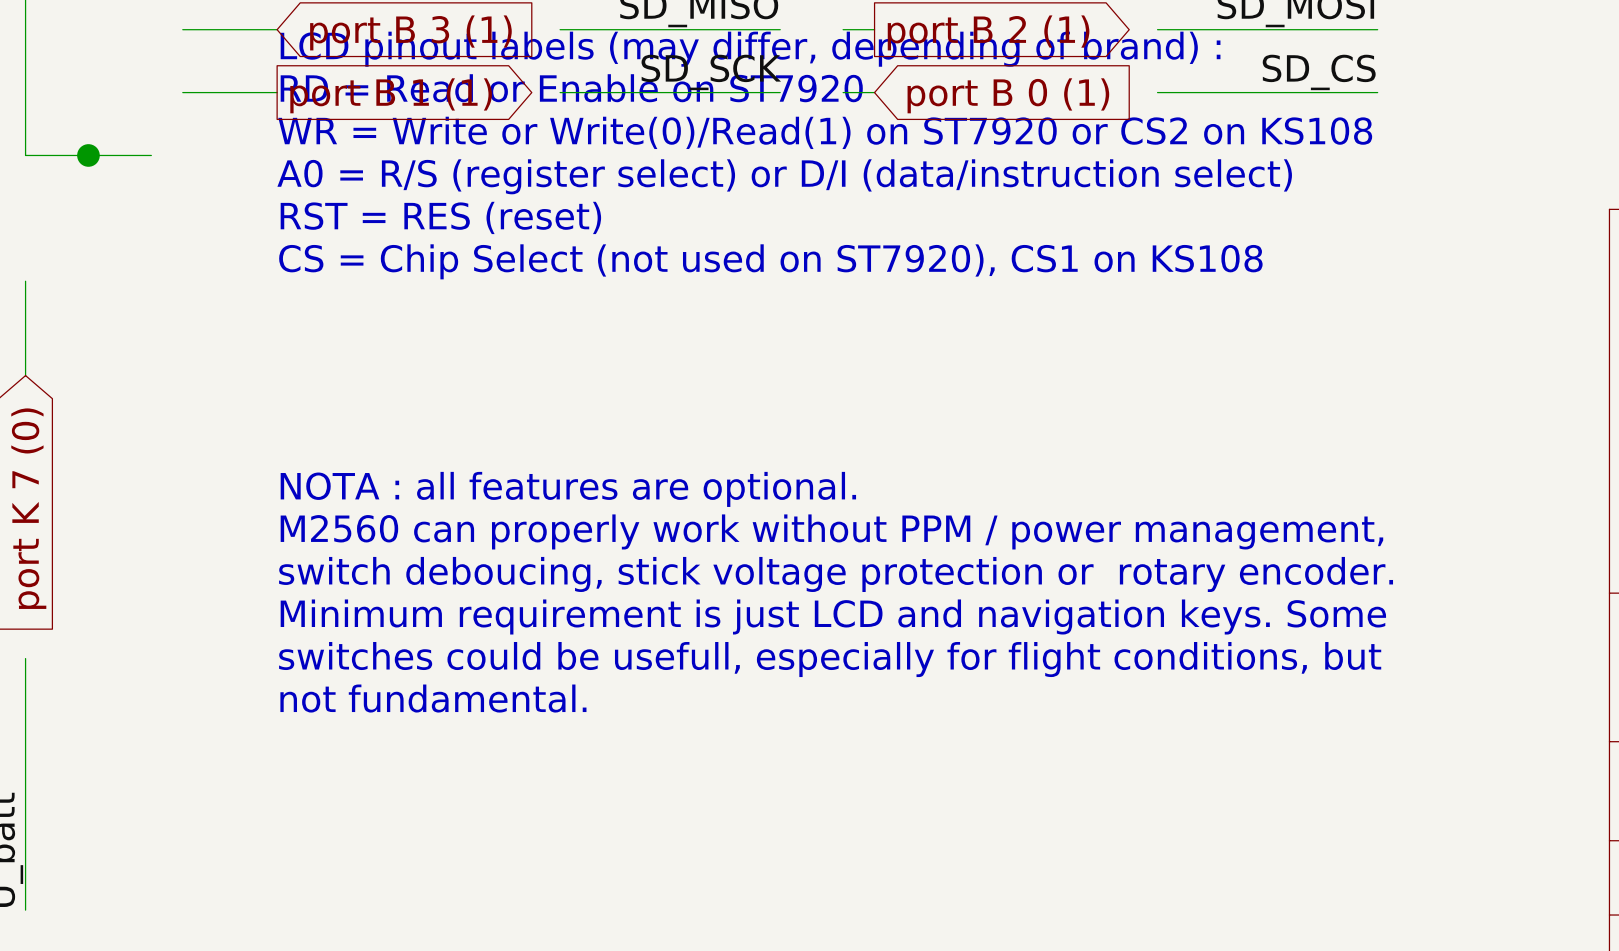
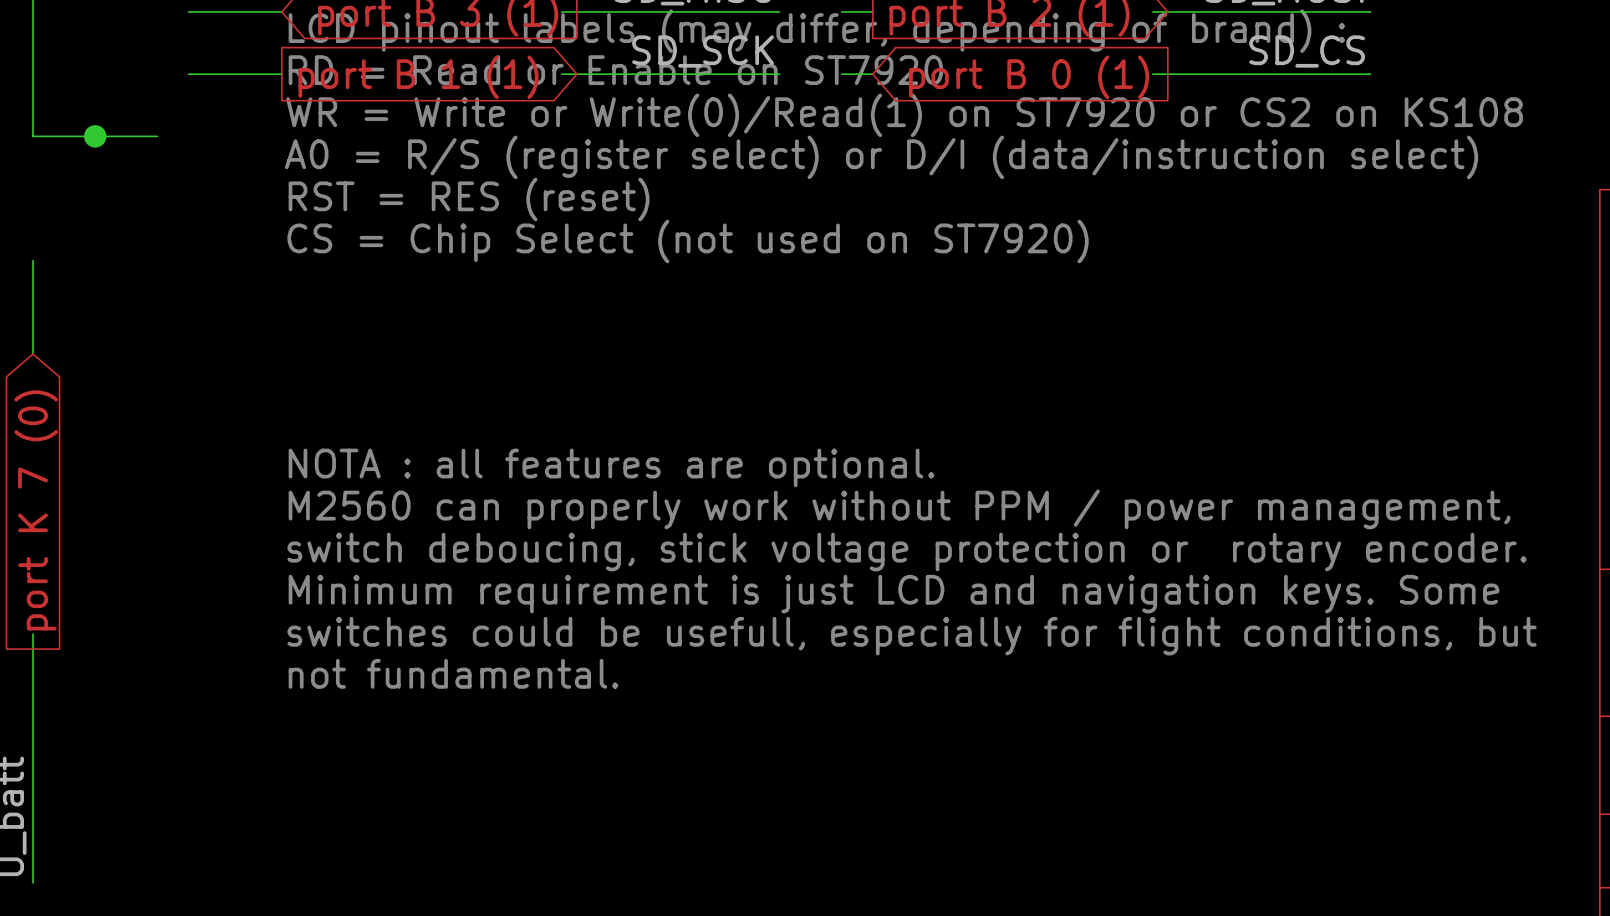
text: CS = Chip Select (not used on ST7920), CS1 on KS108 (770, 261) -> CS = Chip Select (not used on ST7920) (688, 241)

